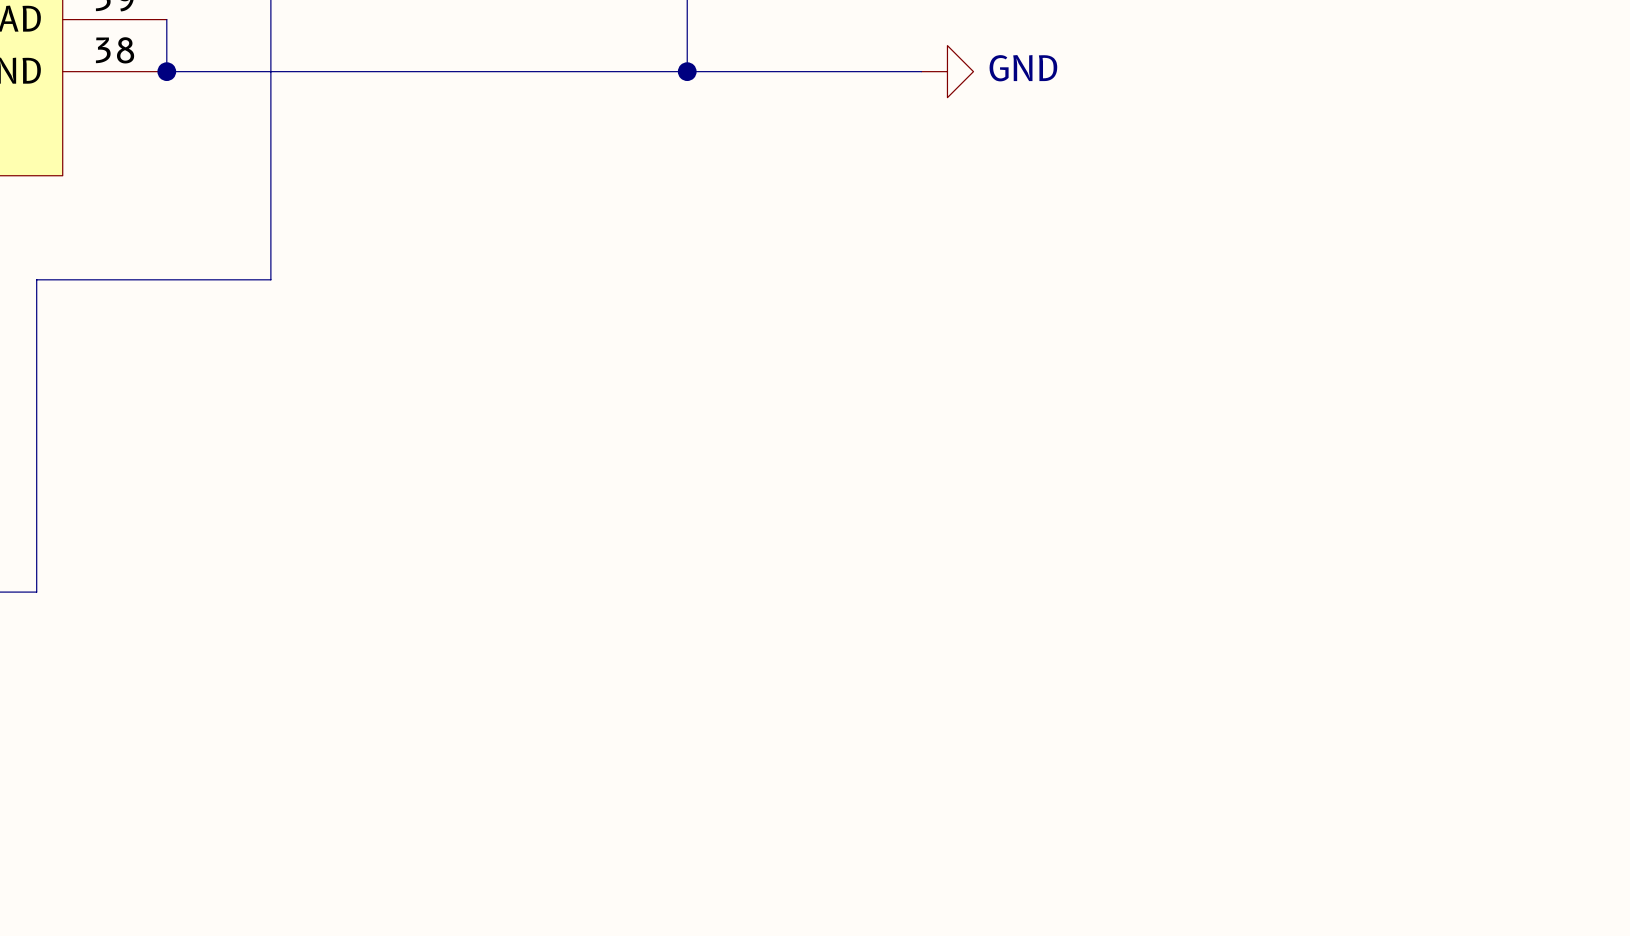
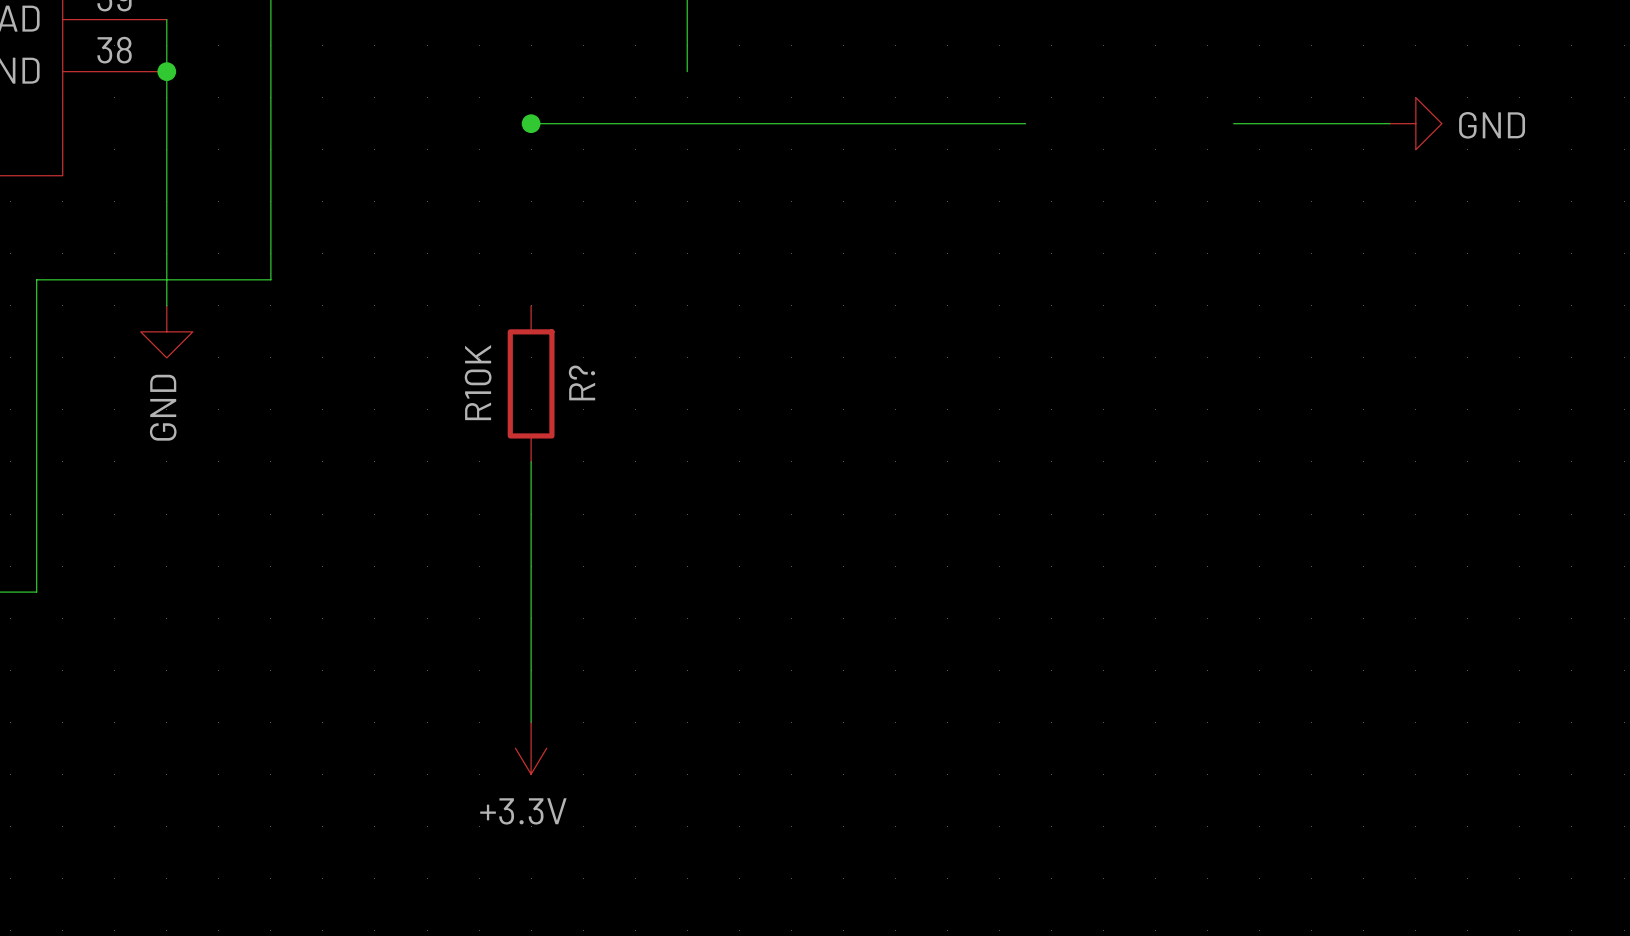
wire: (166, 71) (921, 71) -> (166, 71) (166, 305)
junction: (687, 71) -> none
power symbol: GND (947, 71) -> none
wire: none -> (531, 123) (1025, 123)
junction: none -> (531, 123)
wire: none -> (1233, 123) (1389, 123)
power symbol: none -> GND (1415, 123)
power symbol: none -> GND (166, 331)
R?: none -> R10K (531, 383)
wire: none -> (531, 461) (531, 722)
power symbol: none -> +3.3V (531, 748)

